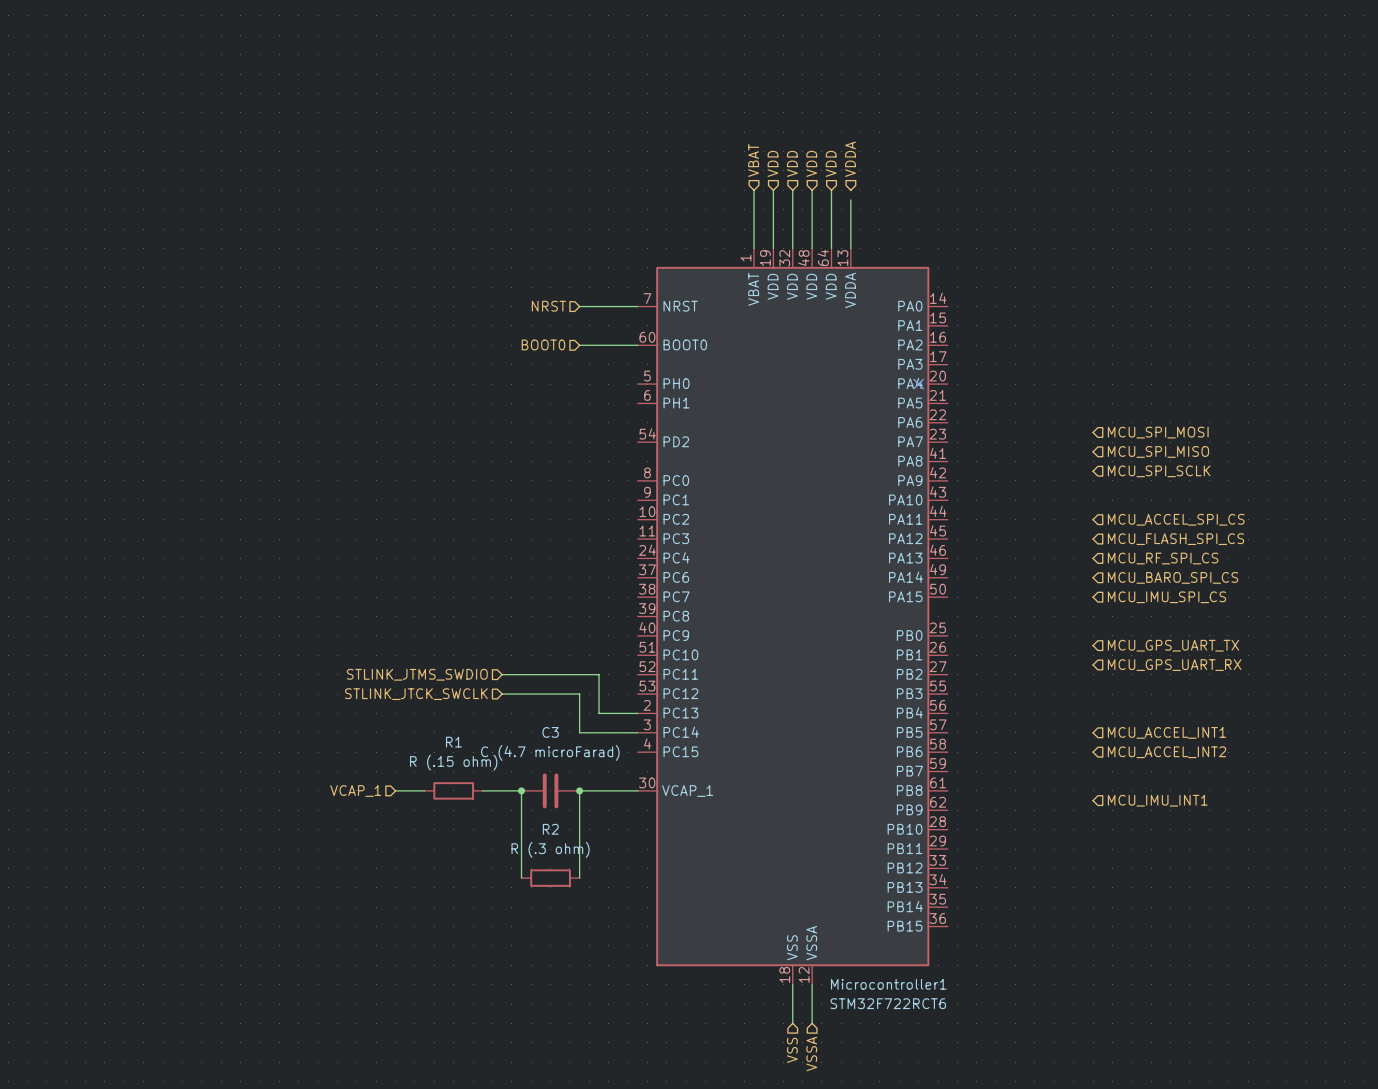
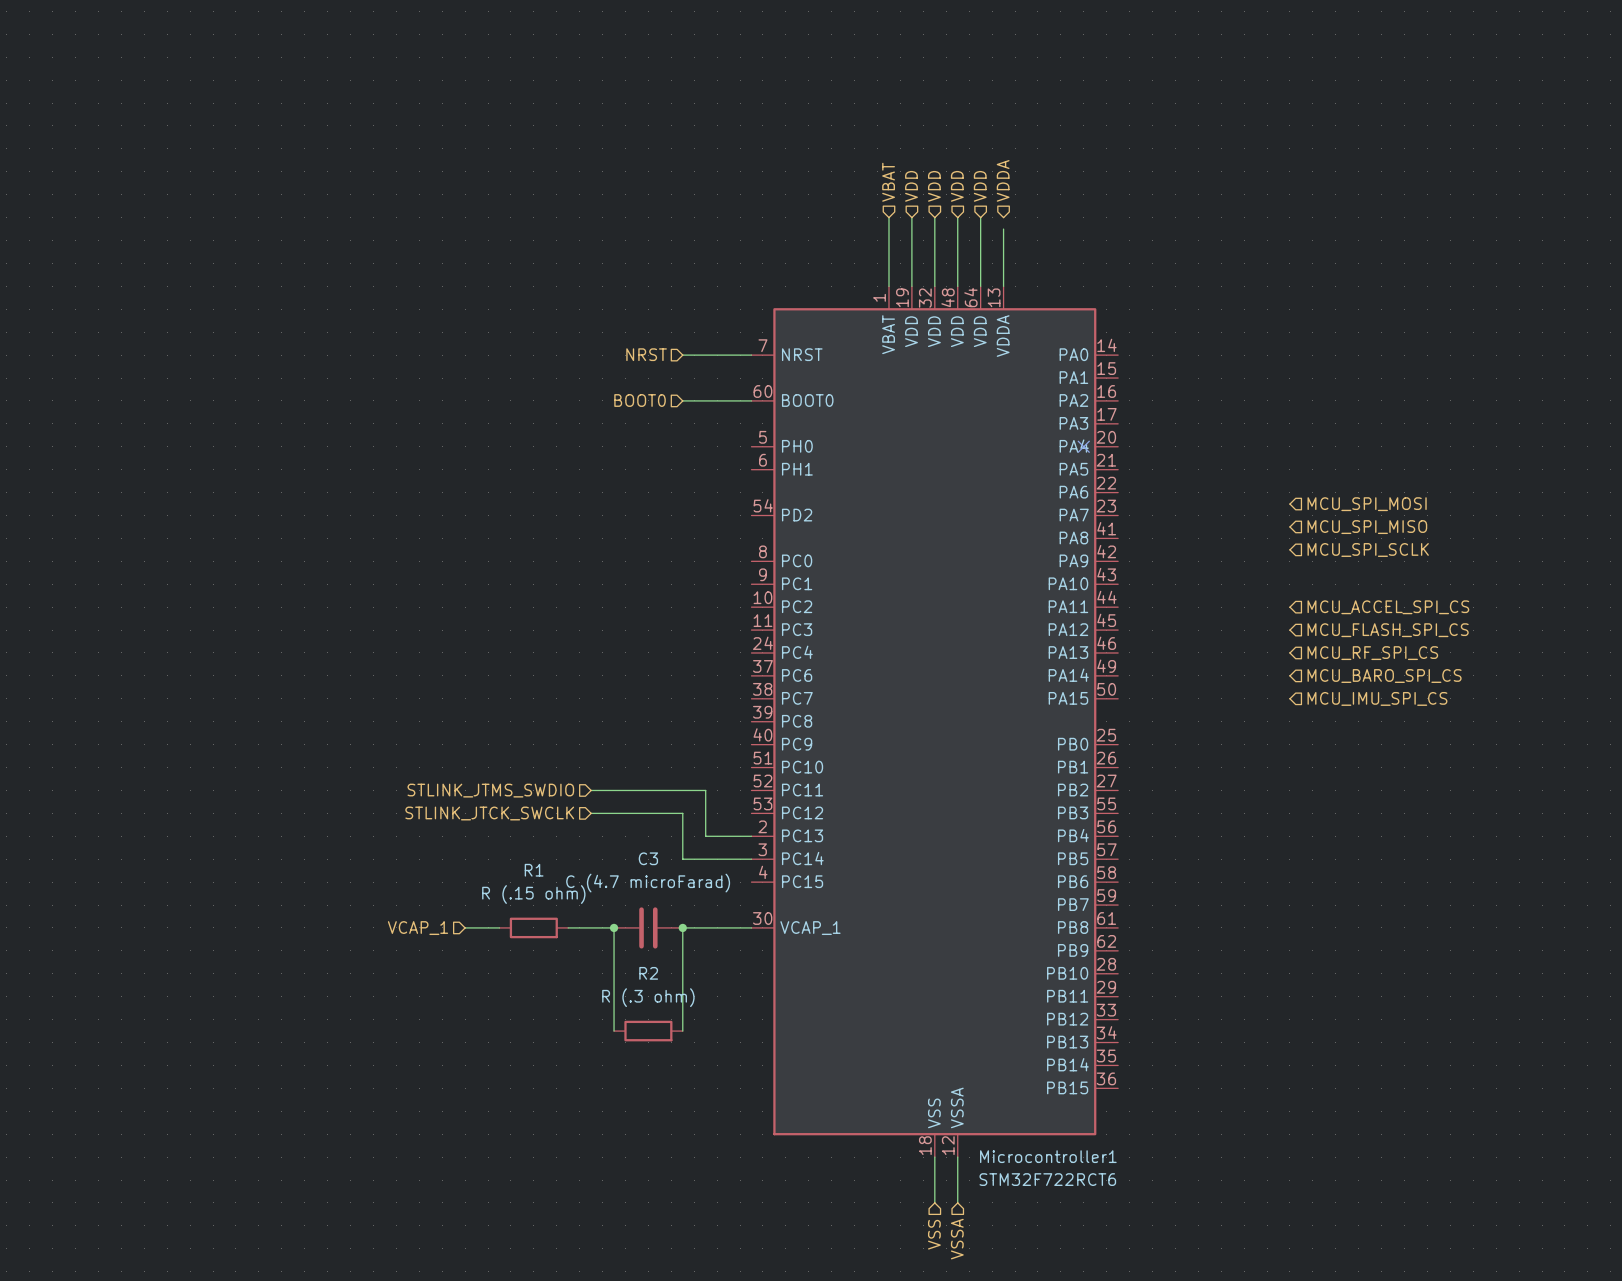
hierarchical label: MCU_GPS_UART_TX (1173, 645) -> none
hierarchical label: MCU_GPS_UART_RX (1174, 665) -> none
hierarchical label: MCU_ACCEL_INT1 (1167, 732) -> none
hierarchical label: MCU_ACCEL_INT2 (1167, 752) -> none
hierarchical label: MCU_IMU_INT1 (1157, 800) -> none

